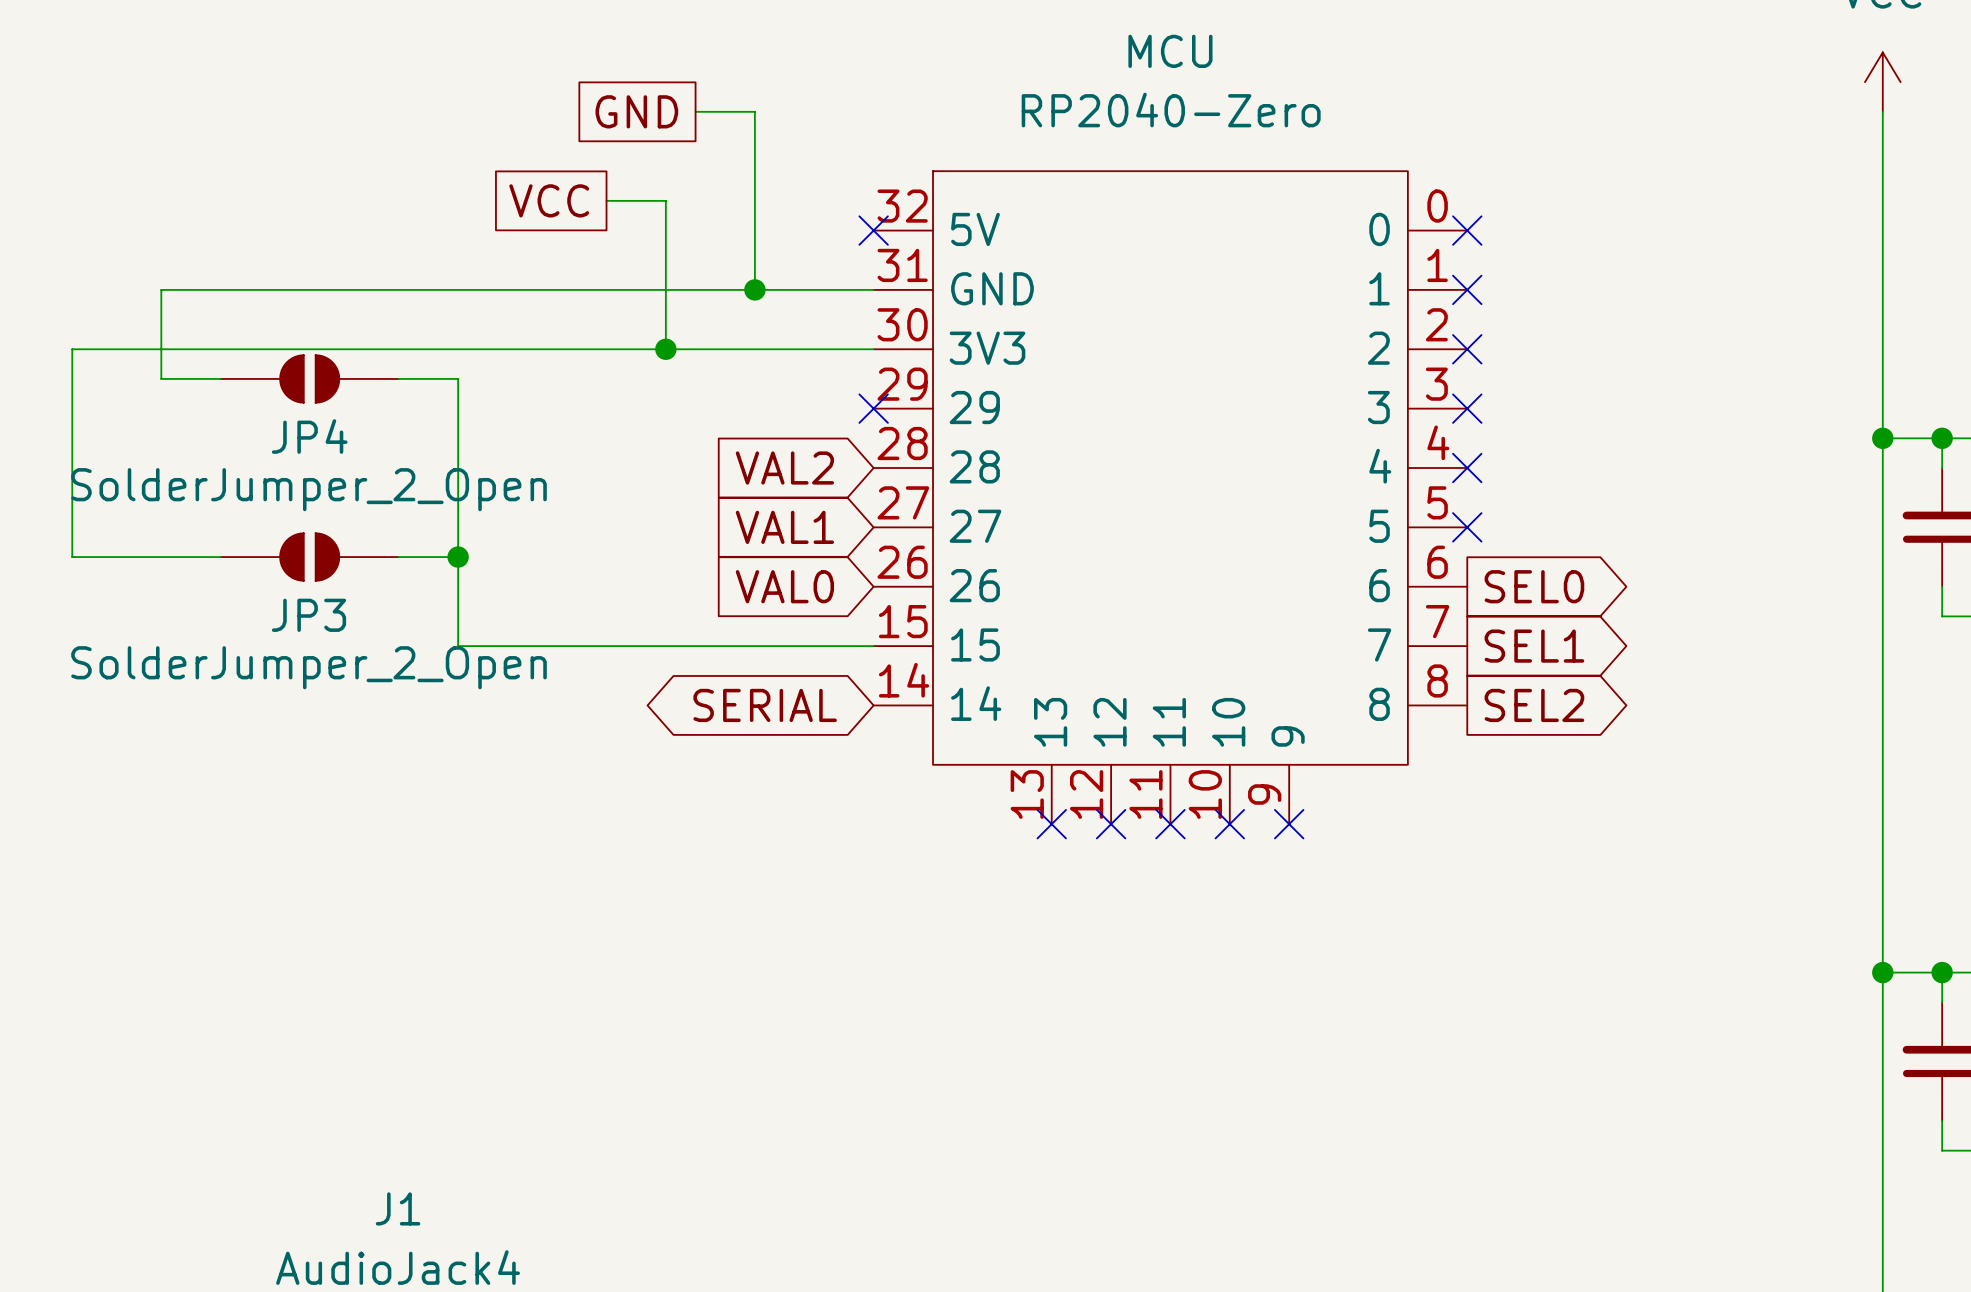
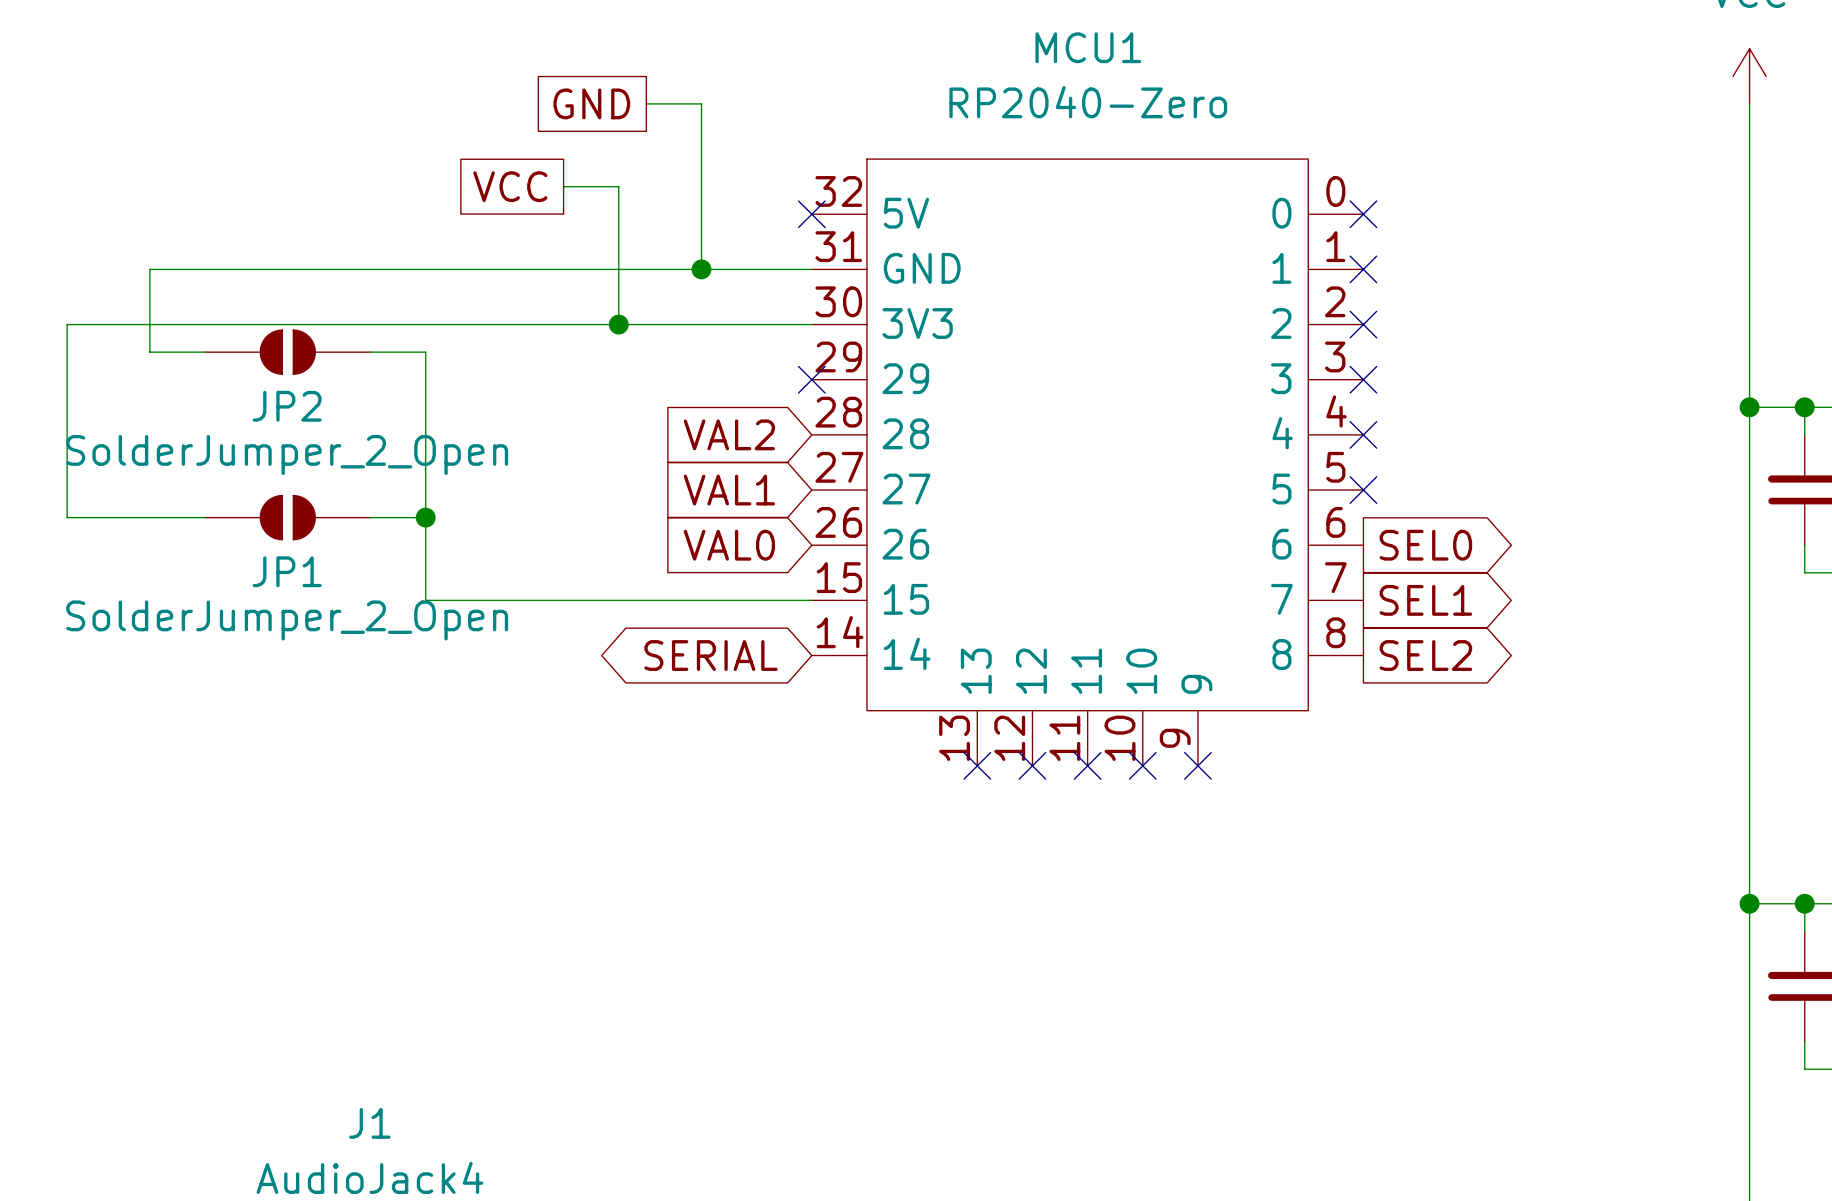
MCU name: MCU (1170, 51) -> MCU1 (1088, 47)
JP4 name: JP4 (309, 436) -> JP2 (287, 406)
JP3 name: JP3 (309, 615) -> JP1 (287, 571)

